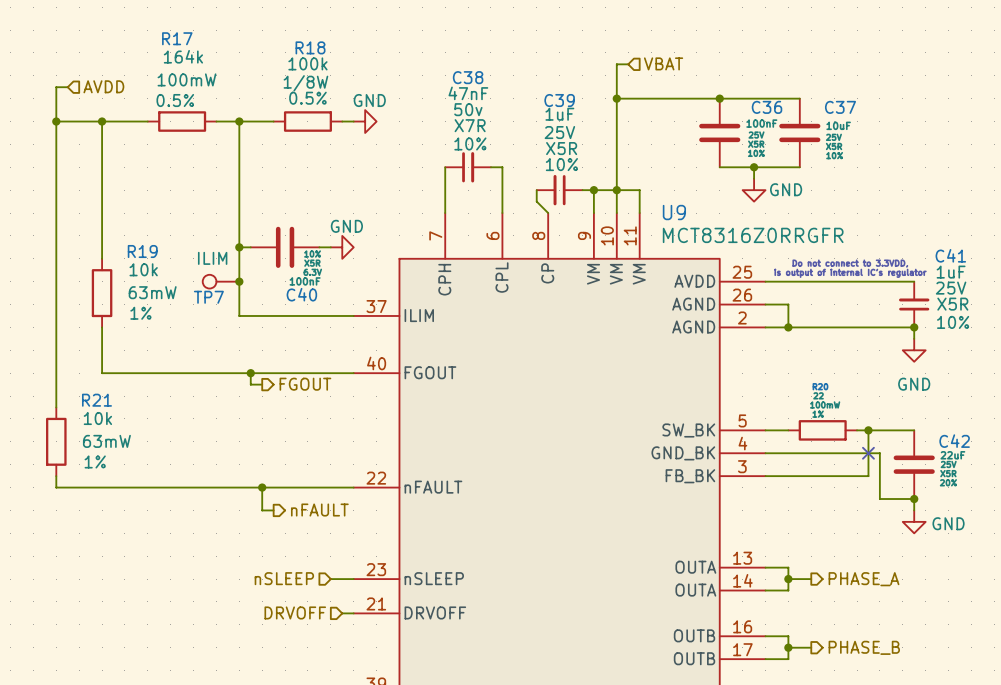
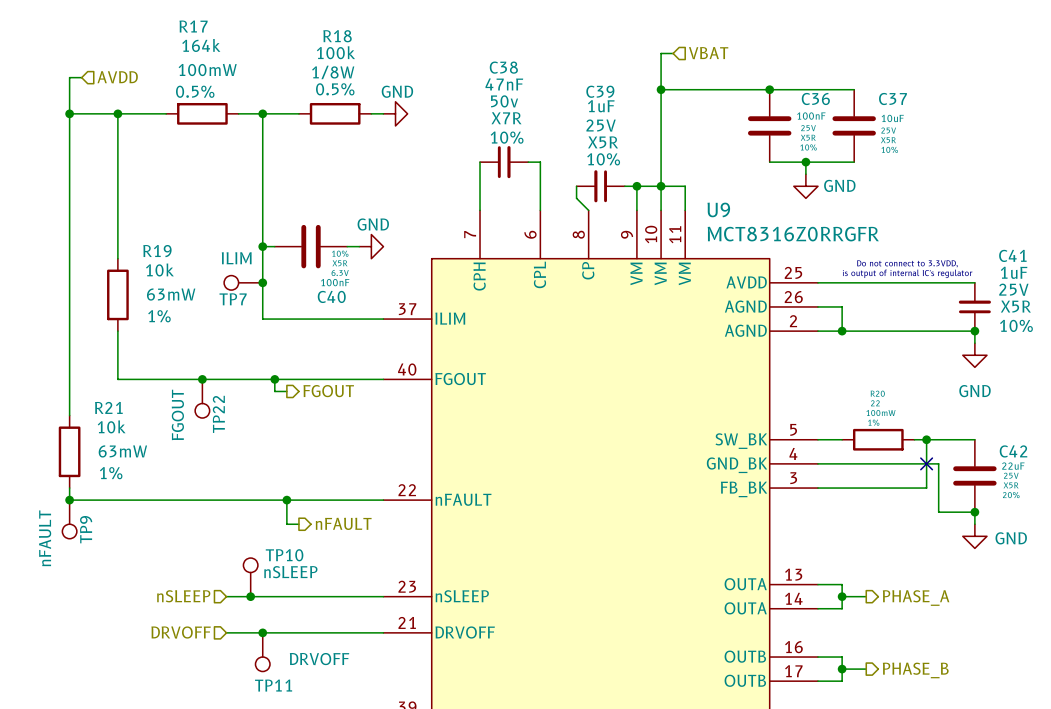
junction: none -> (202, 379)
TP22: none -> FGOUT (202, 398)
junction: none -> (69, 500)
TP9: none -> nFAULT (69, 519)
TP10: none -> nSLEEP (250, 577)
hierarchical label position: nSLEEP (284, 578) -> nSLEEP (183, 596)
wire: none -> (226, 596) (359, 596)
junction: none -> (250, 596)
hierarchical label position: DRVOFF (295, 612) -> DRVOFF (181, 632)
wire: none -> (226, 632) (371, 632)
junction: none -> (262, 632)
TP11: none -> DRVOFF (262, 652)

